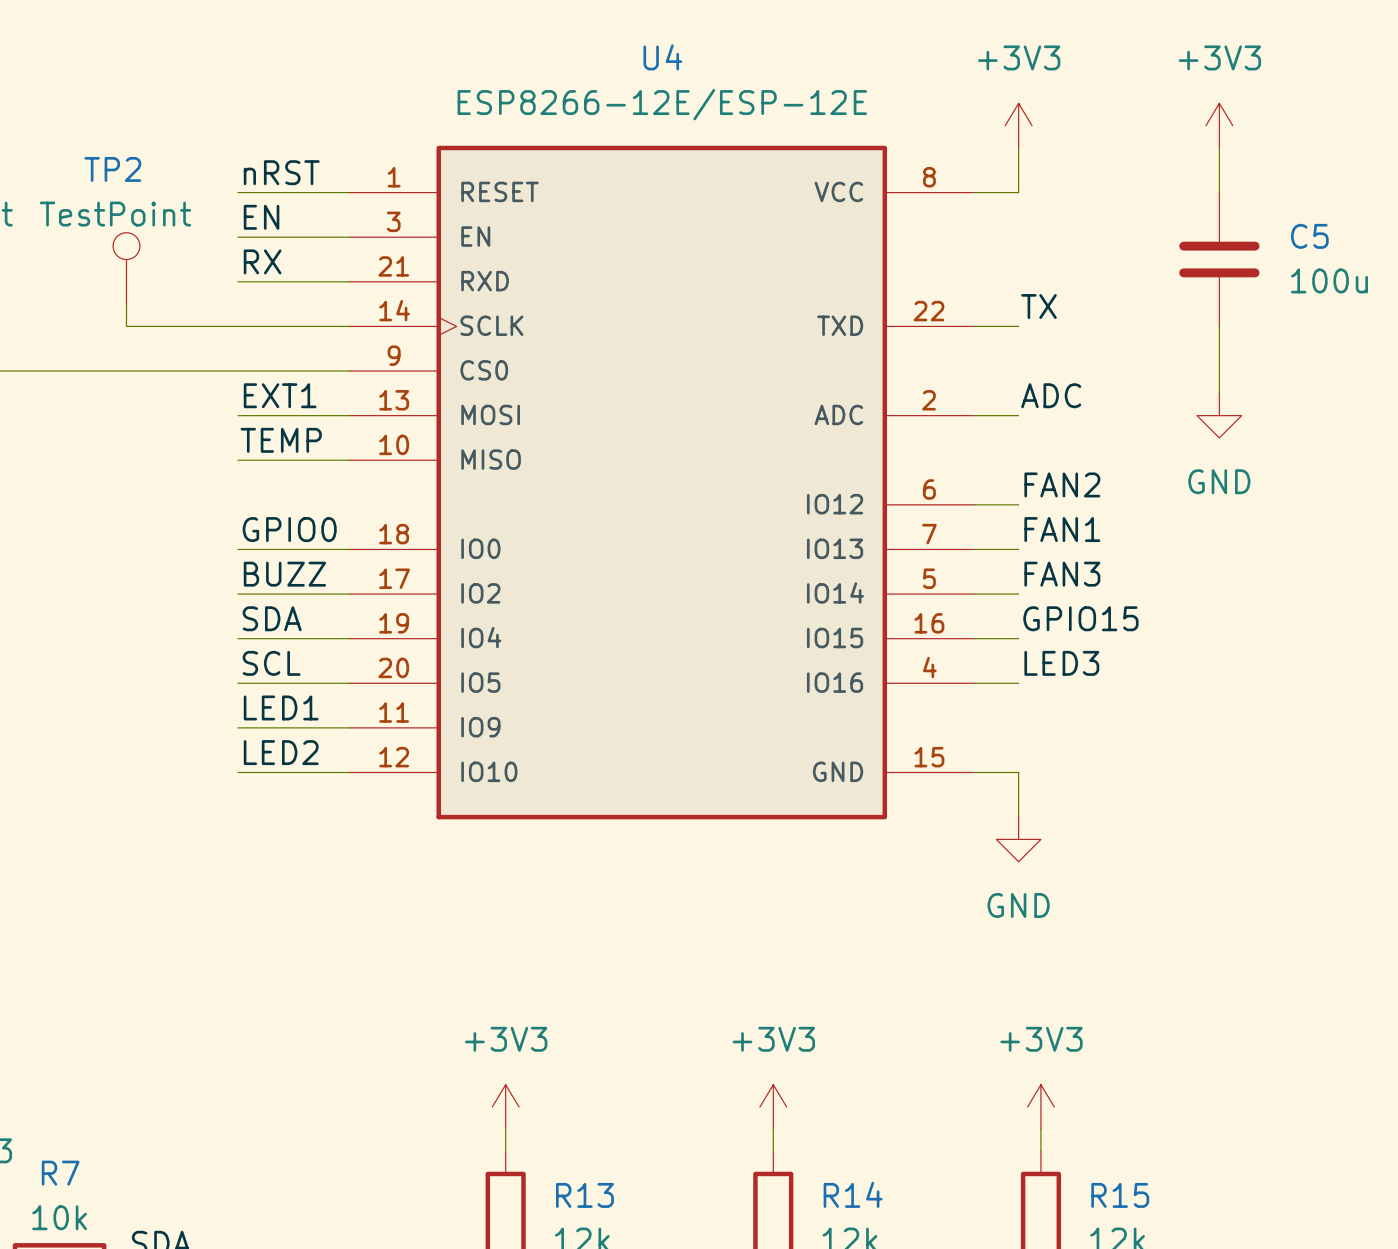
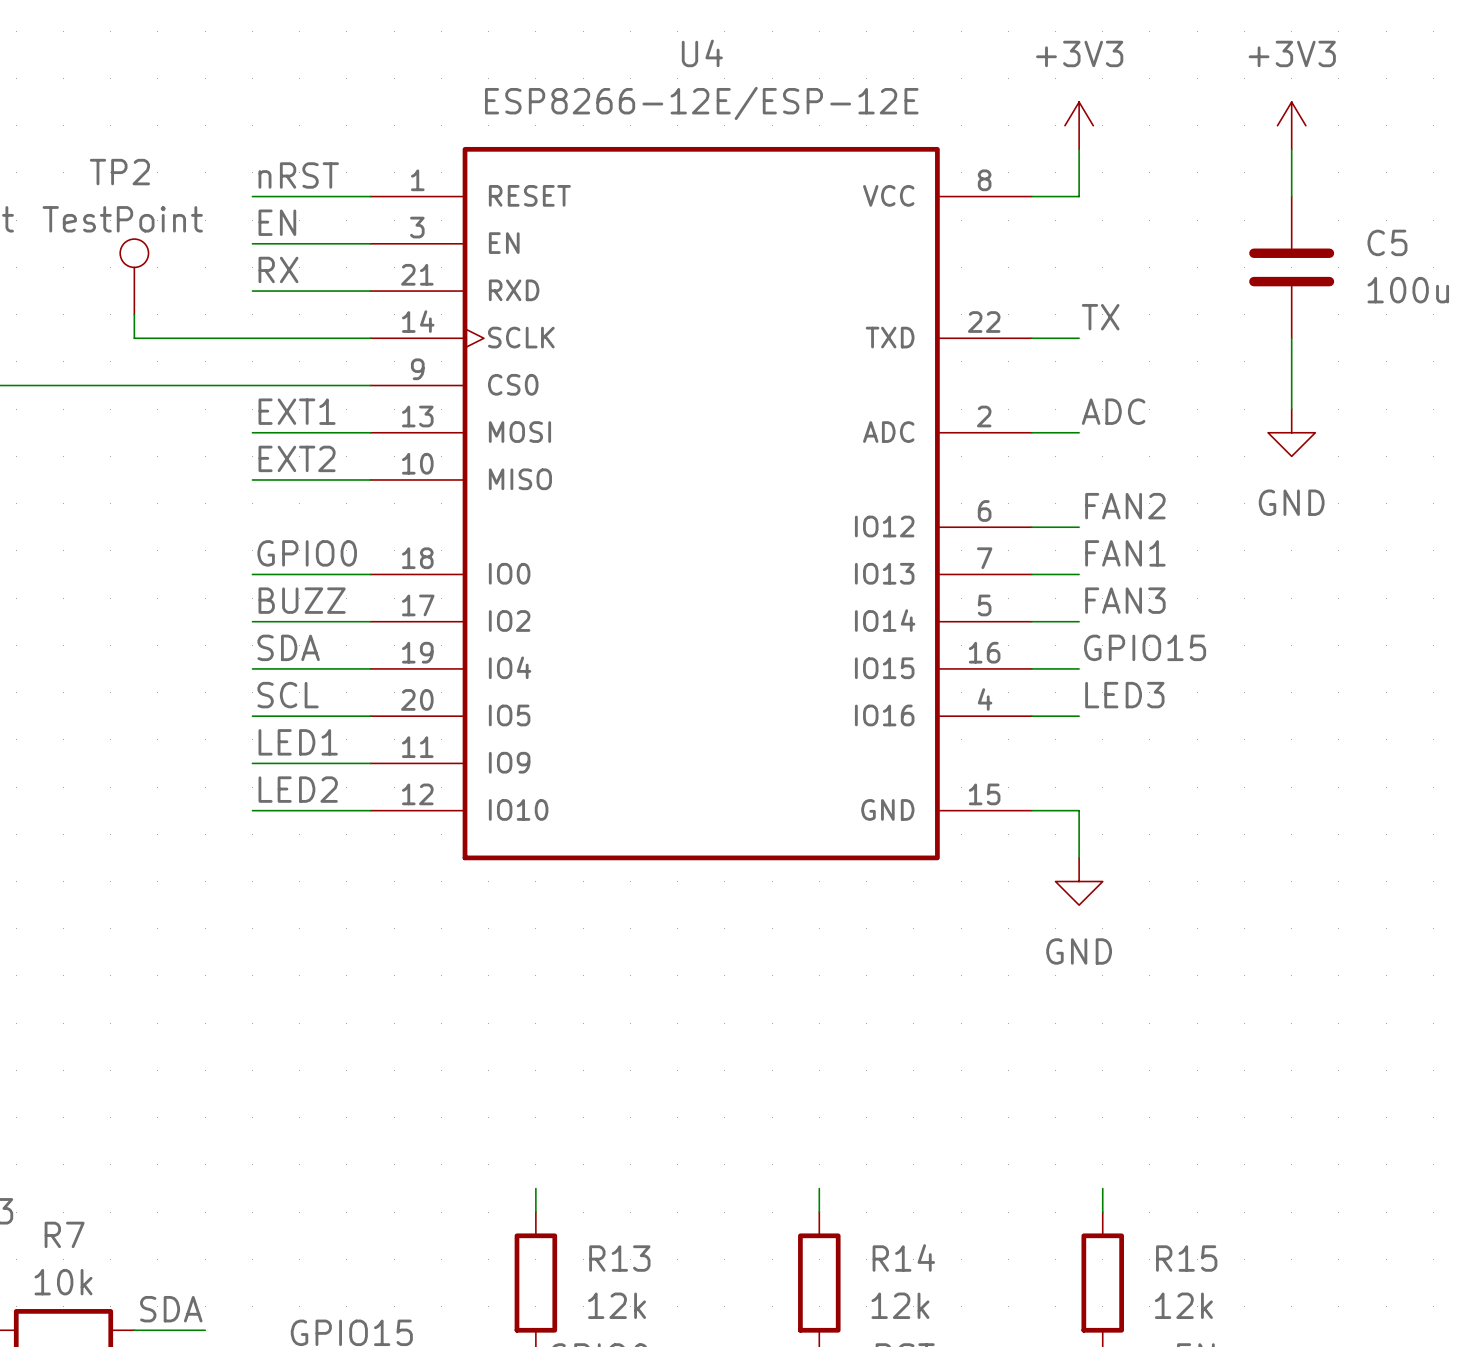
label: TEMP (281, 440) -> EXT2 (297, 458)
power symbol: +3V3 (505, 1107) -> none
power symbol: +3V3 (773, 1107) -> none
power symbol: +3V3 (1040, 1107) -> none

